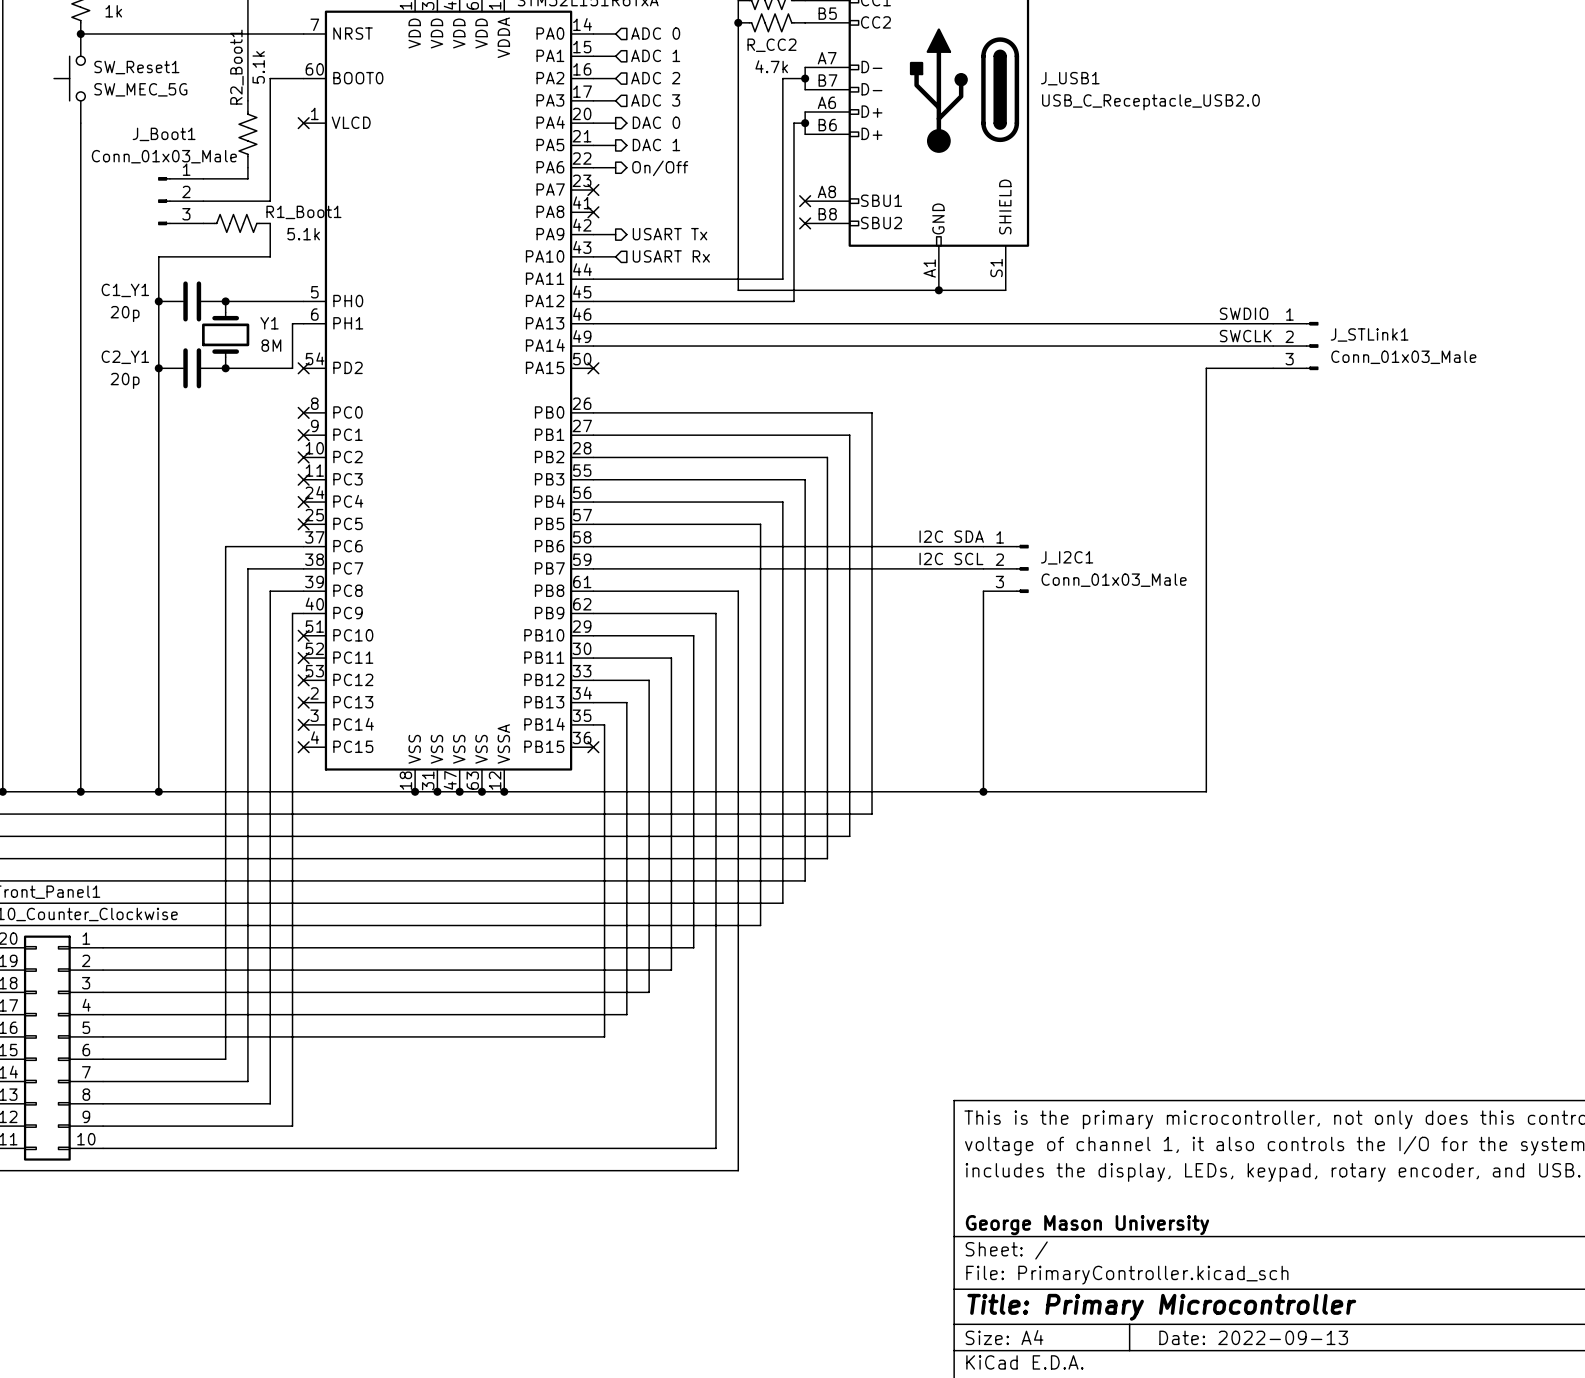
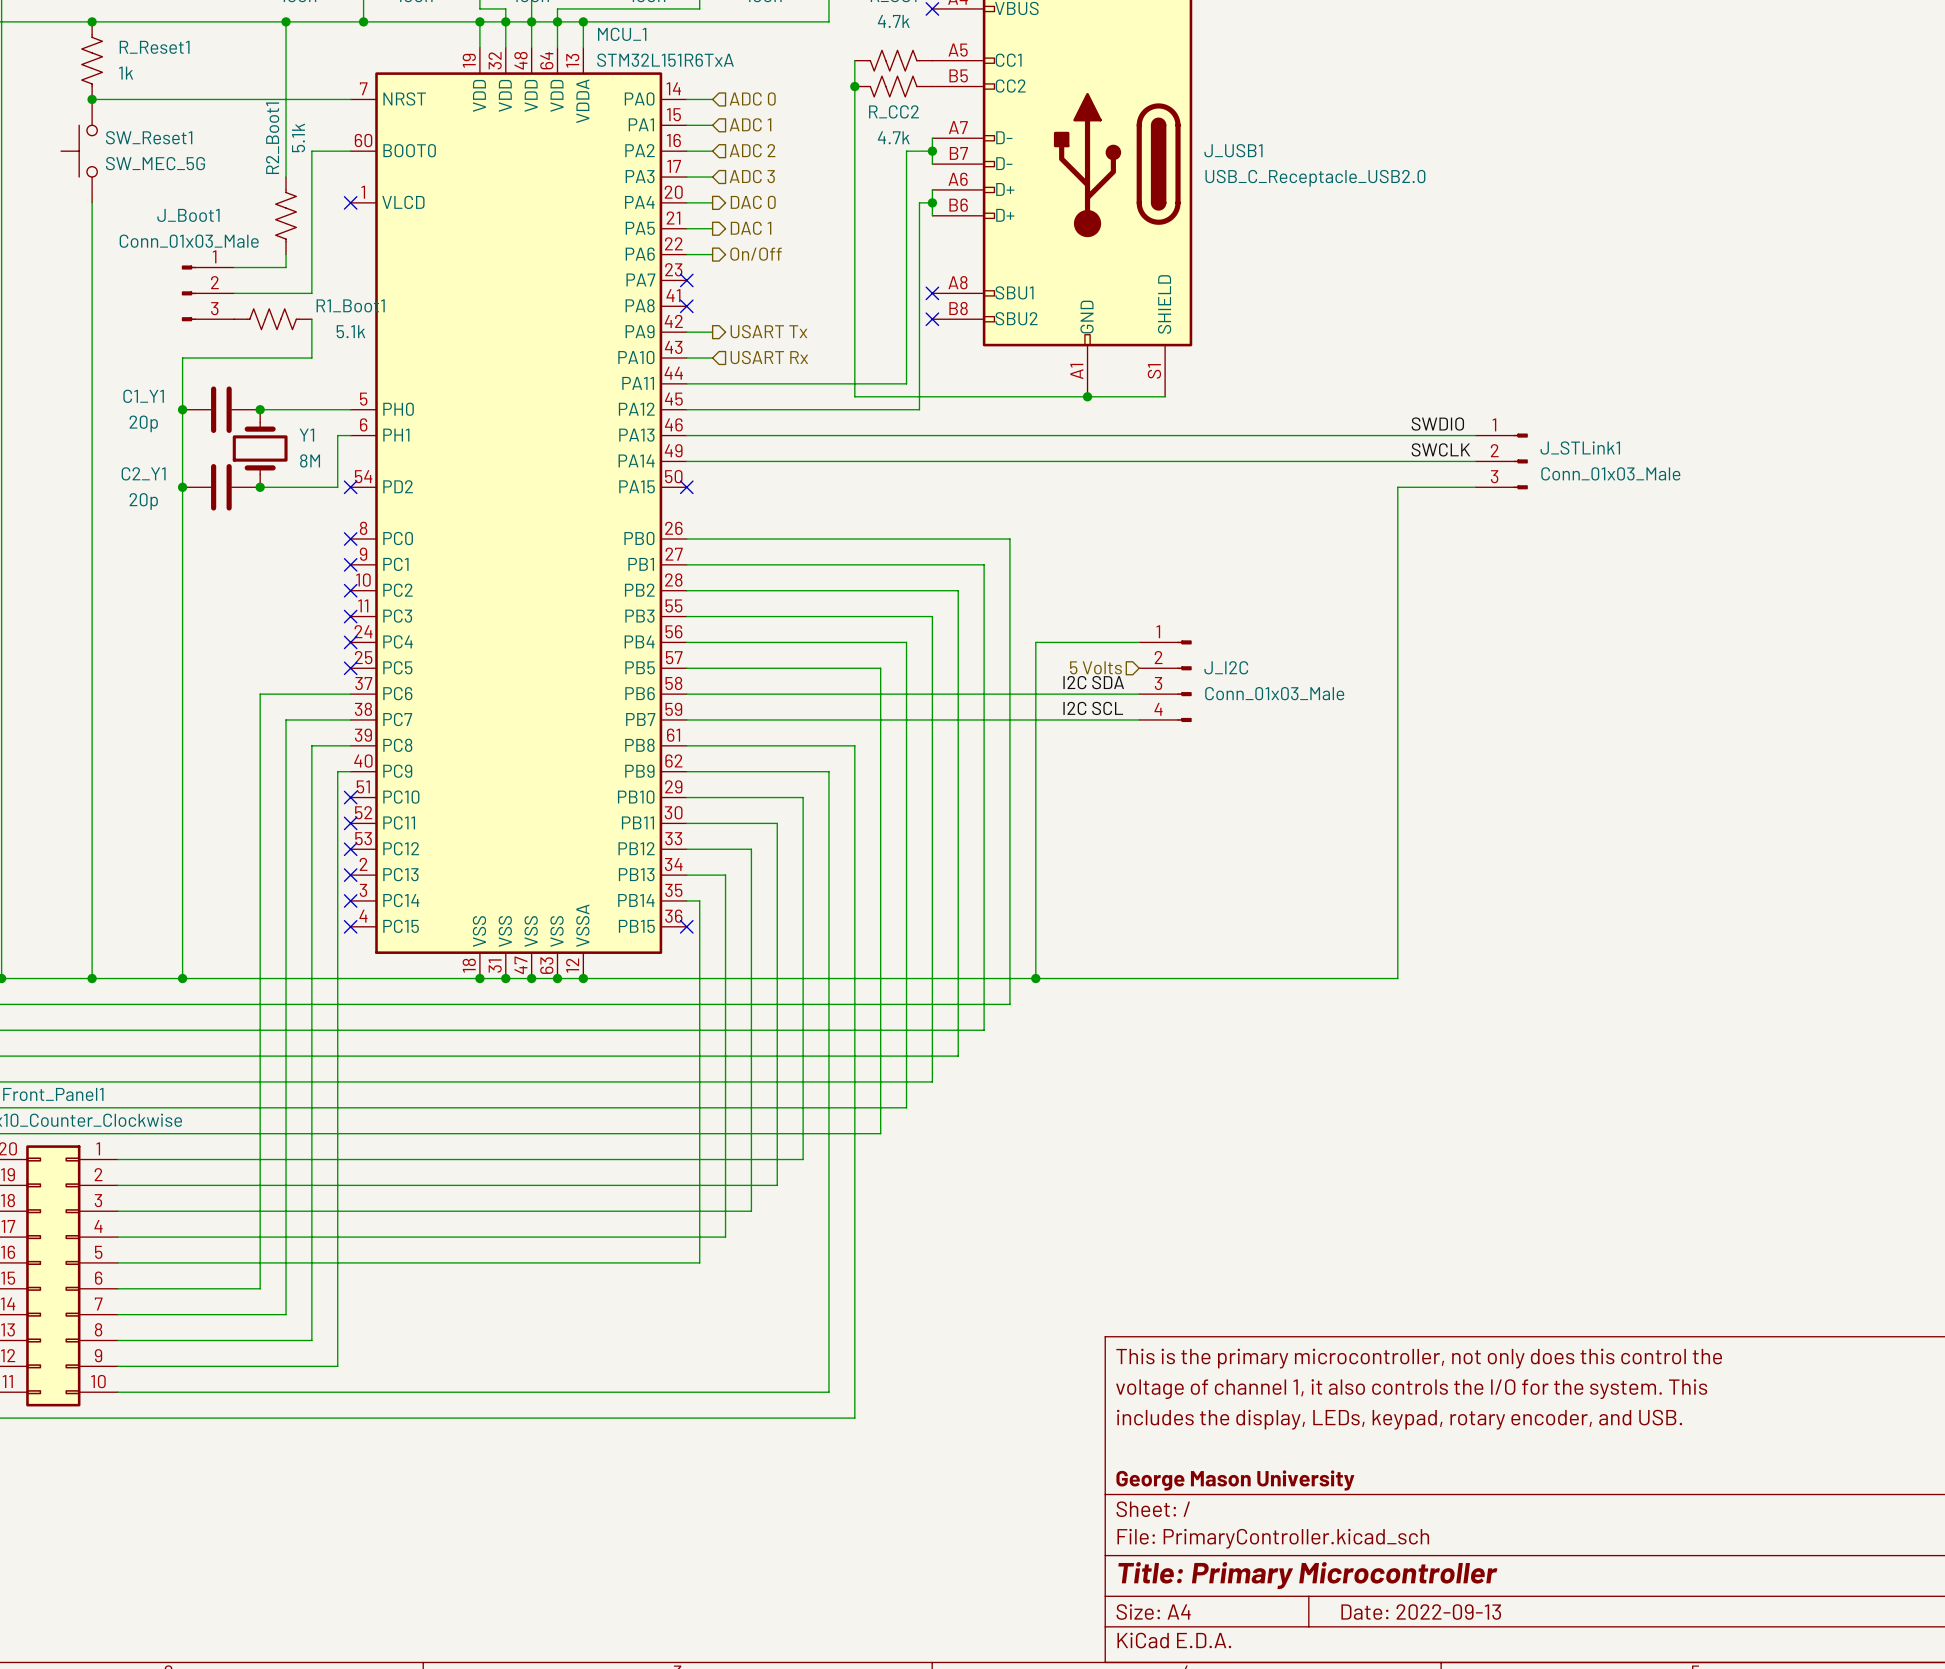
wire: none -> (1139, 642) (1035, 642) (1035, 978)
hierarchical label: none -> 5 Volts (1095, 667)
J_I2C: none -> Conn_01x03_Male (1165, 681)
J_I2C1: Conn_01x03_Male (1006, 568) -> none
wire: (983, 591) (983, 791) -> none
junction: none -> (1035, 978)
junction: (983, 791) -> none

